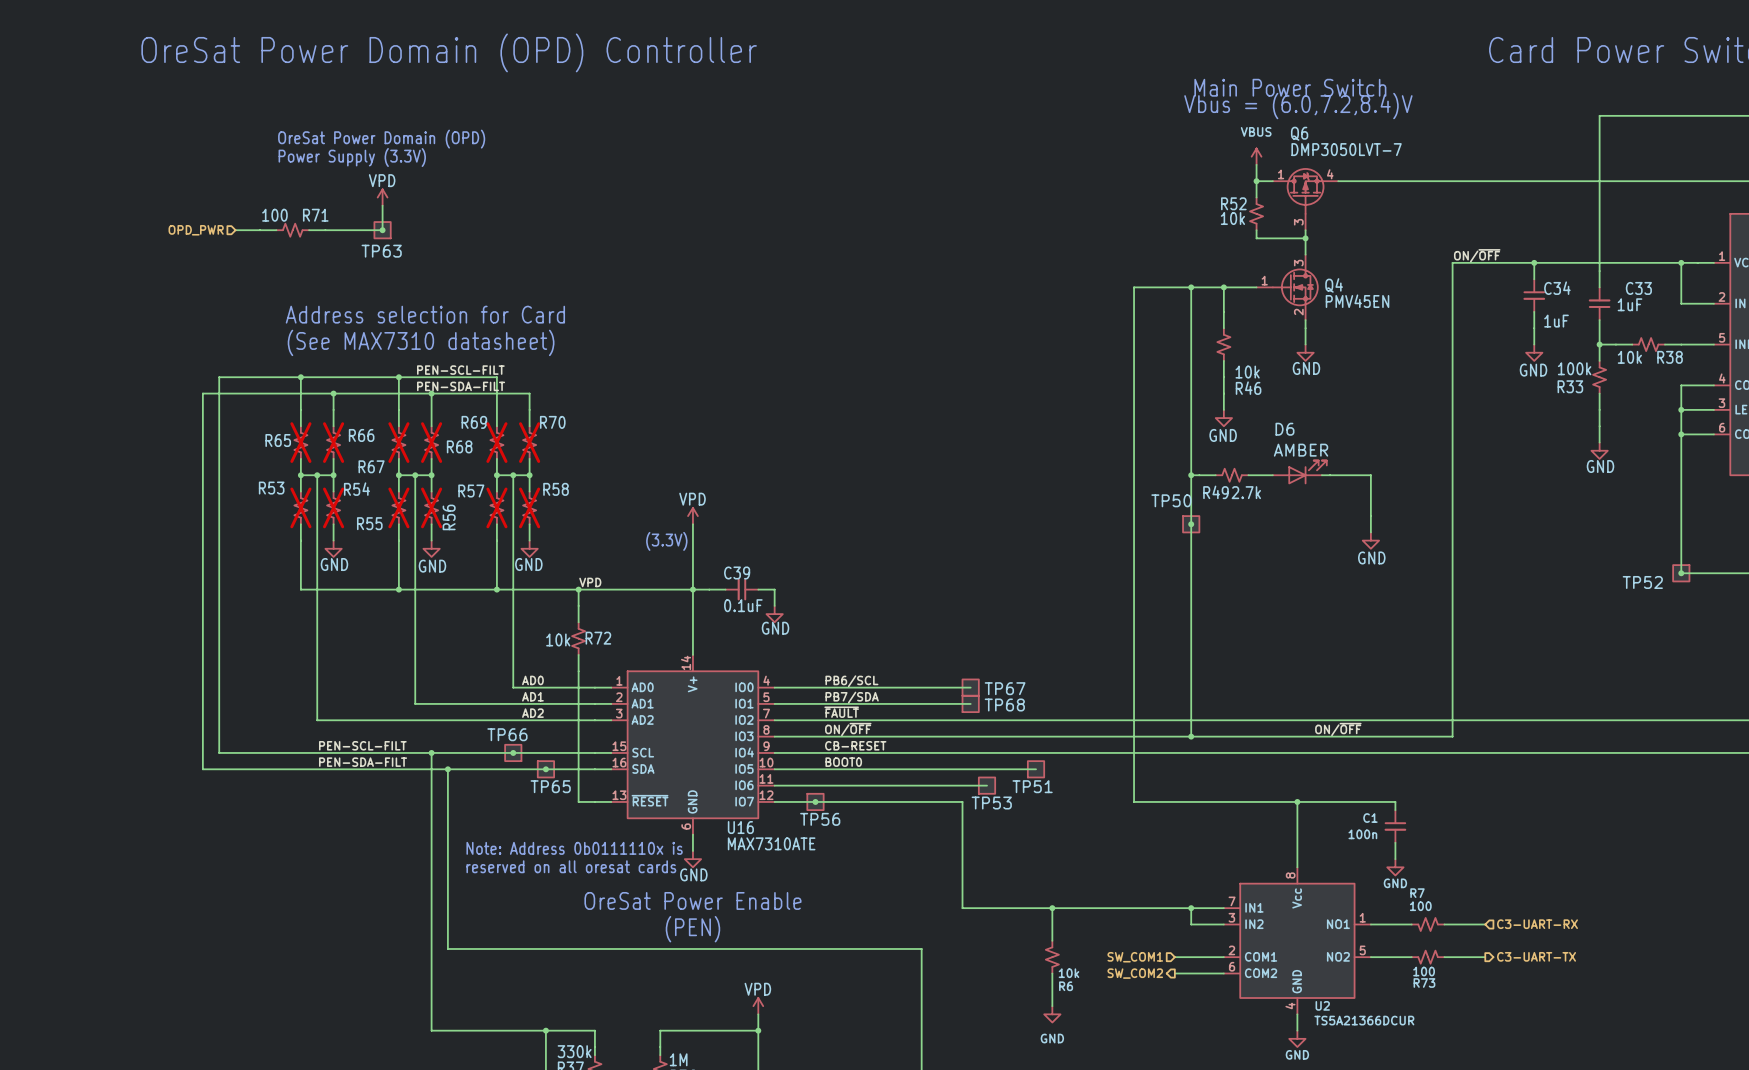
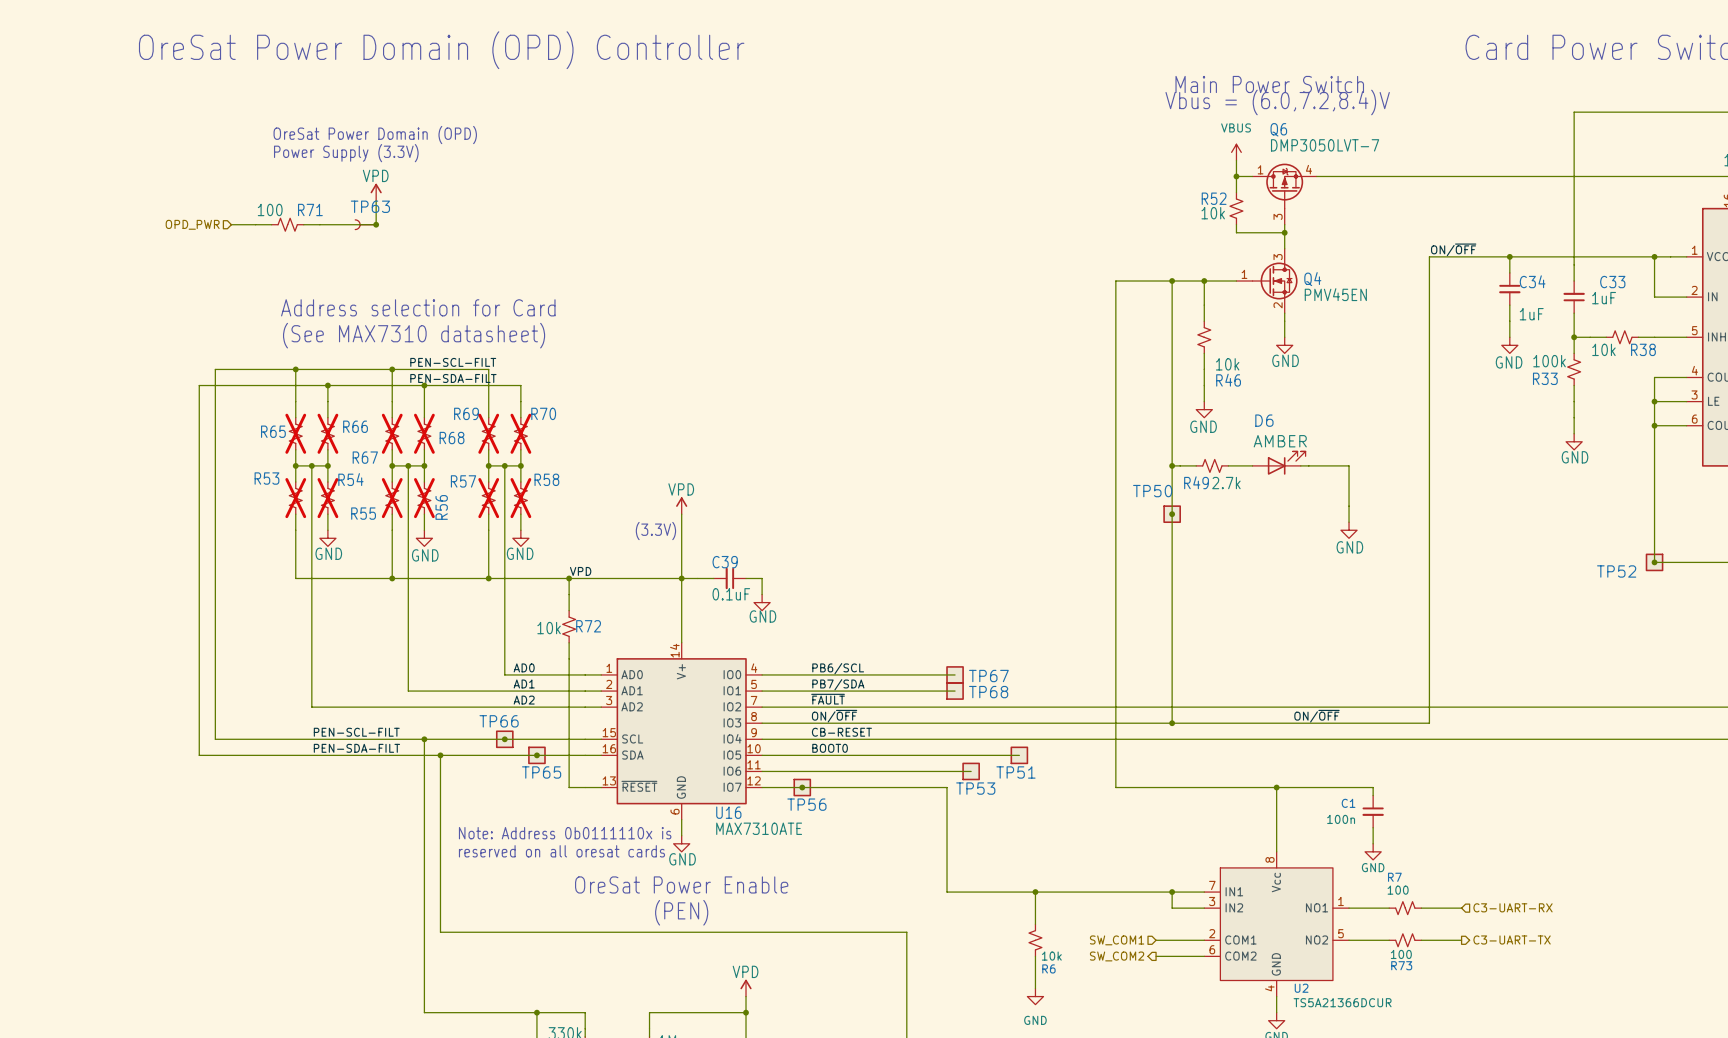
TP63 symbol: [373, 221, 392, 240] -> [354, 219, 377, 231]
TP63 name position: TP63 (381, 251) -> TP63 (370, 206)

